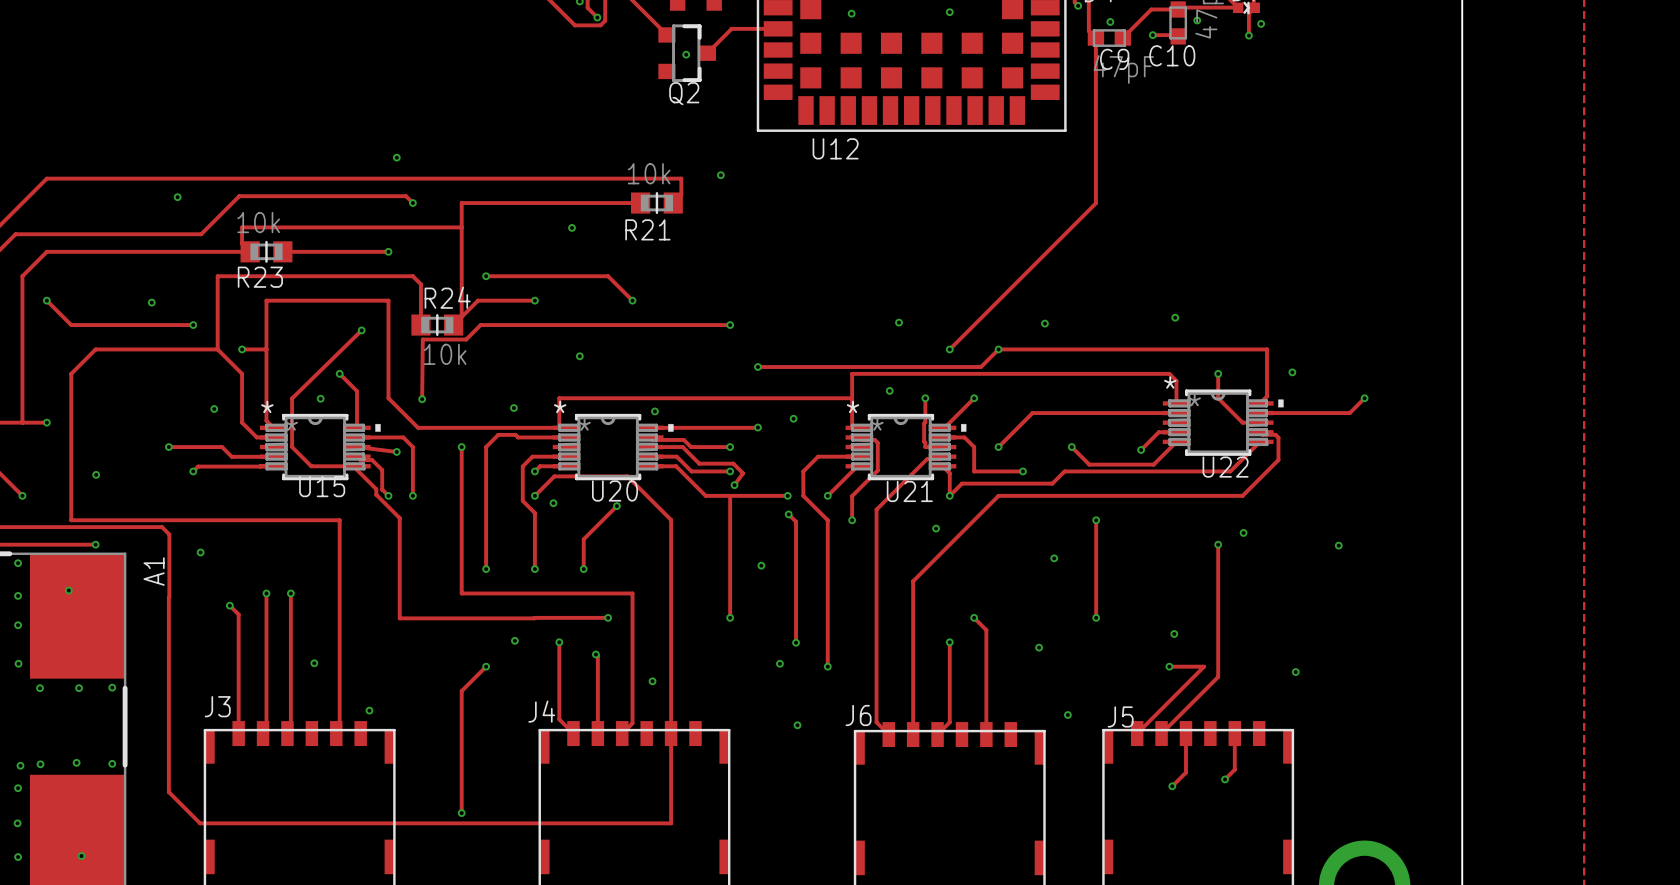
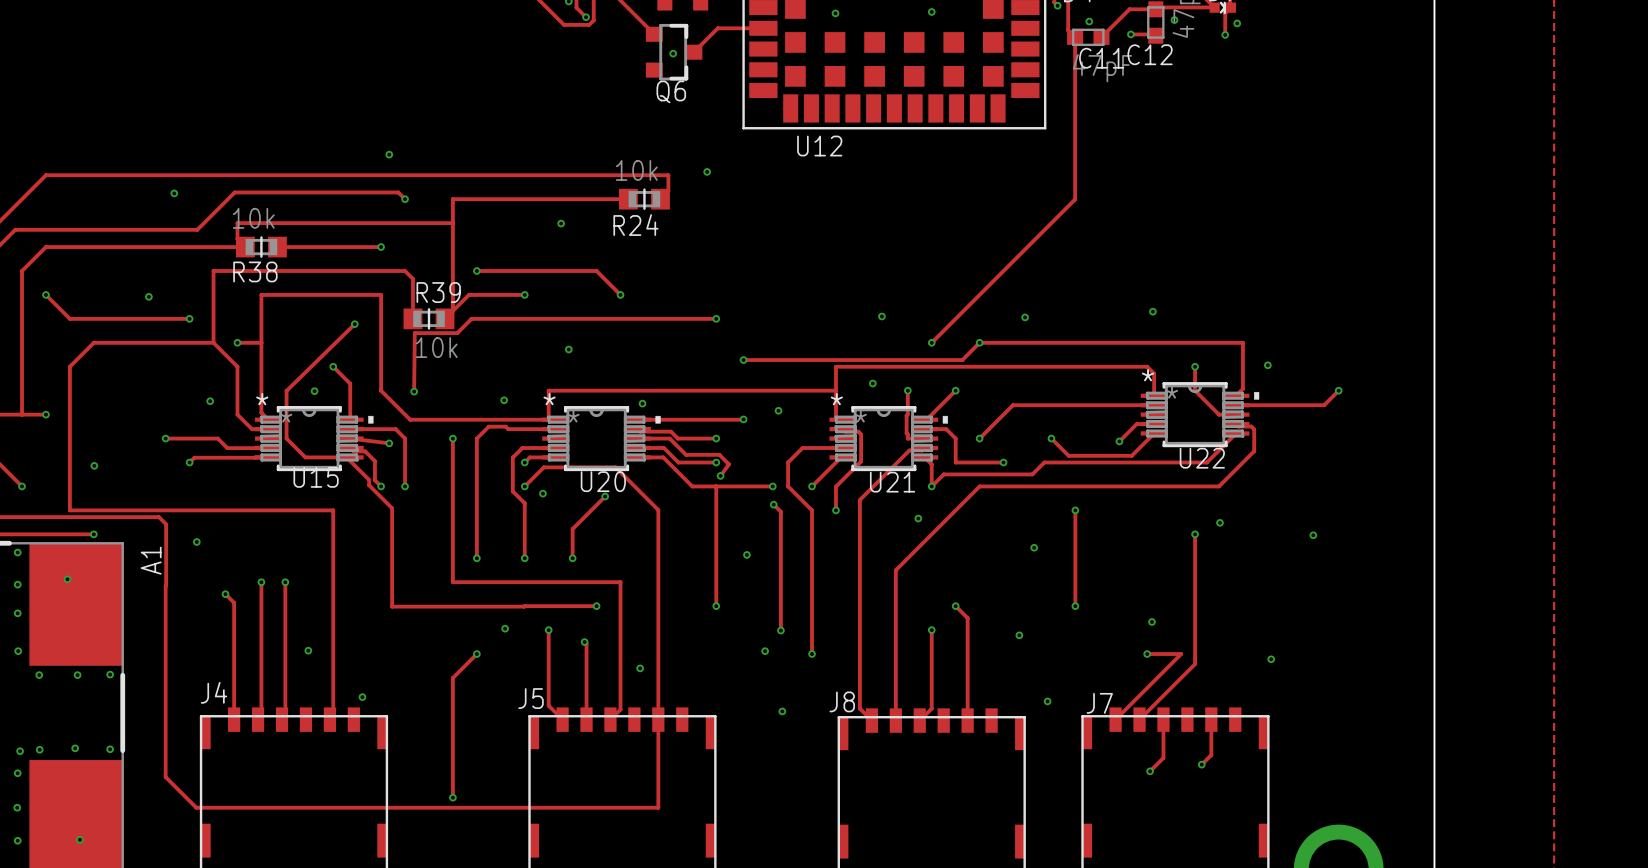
C10 name: C10 (1172, 55) -> C12 (1150, 54)
C9 name: C9 (1114, 59) -> C11 (1101, 58)
Q2 name: Q2 (684, 93) -> Q6 (671, 91)
R21 name: R21 (647, 229) -> R24 (635, 225)
R23 name: R23 (260, 277) -> R38 (255, 271)
R24 name: R24 (447, 297) -> R39 (438, 292)
J3 name: J3 (217, 706) -> J4 (214, 692)
J4 name: J4 (541, 711) -> J5 (531, 698)
J6 name: J6 (858, 715) -> J8 (842, 701)
J5 name: J5 (1120, 716) -> J7 (1099, 703)

